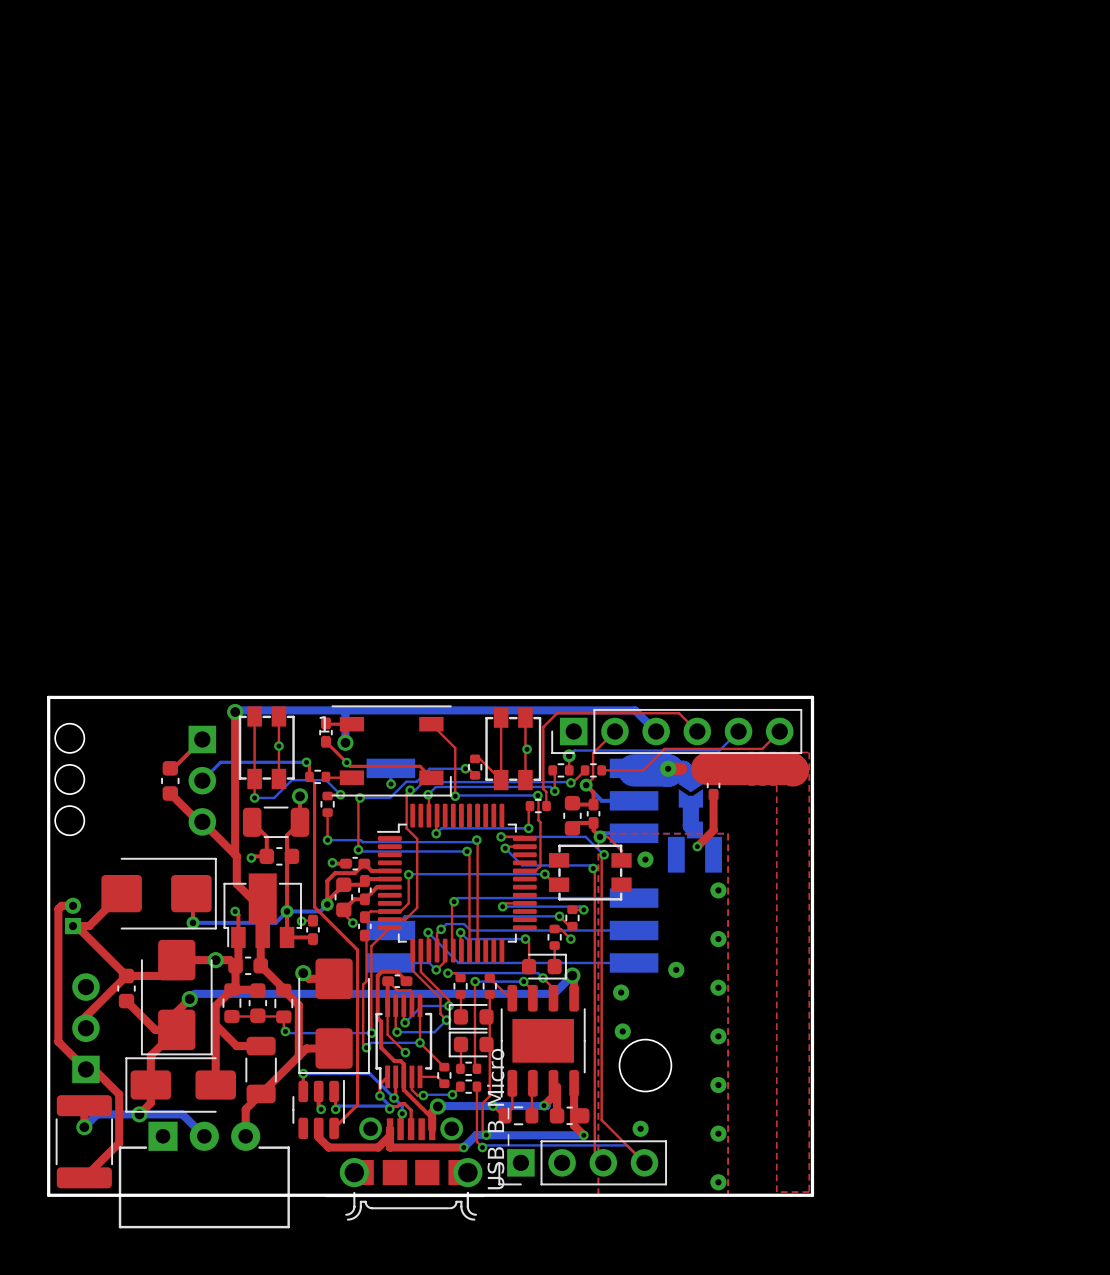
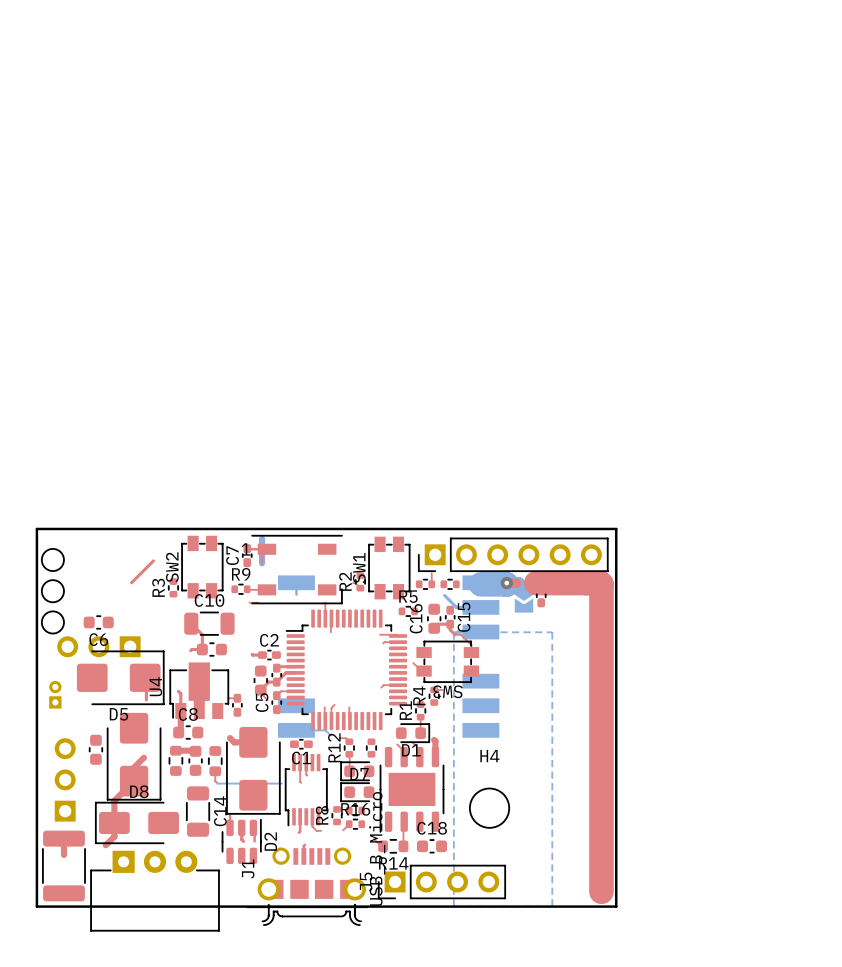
top track: (235, 712) (235, 854) -> none
bottom track: (235, 712) (236, 710) (635, 710) (656, 731) -> none
via: (235, 712) -> none
top track: (254, 716) (254, 797) -> none
top track: (278, 716) (278, 778) -> none
top track: (501, 717) (501, 780) (479, 758) (475, 758) -> none
top track: (525, 717) (525, 747) (527, 749) (525, 750) (525, 780) -> none
top track: (431, 724) (455, 748) (455, 796) -> none
top track: (614, 731) (593, 753) (593, 778) (586, 785) (593, 792) (593, 804) (573, 804) -> none
top track: (697, 731) (679, 713) (557, 713) (543, 727) (543, 788) (546, 791) (546, 805) -> none
bottom track: (738, 731) (719, 750) (574, 750) (569, 755) -> none
top track: (779, 731) (762, 748) (664, 748) (643, 770) (601, 770) -> none
C7 name: none -> C7 (232, 555)
top track: (325, 741) (350, 766) (420, 766) (431, 777) -> none
via: (345, 742) -> none
via: (278, 746) -> none
SW2 name: none -> SW2 (172, 567)
SW1 name: none -> SW1 (359, 568)
via: (527, 749) -> none
top zone outline: (747, 752) (809, 752) (809, 1192) (776, 1192) (776, 784) (747, 784) (747, 752) -> none
via: (569, 755) -> none
R9 name: none -> R9 (241, 574)
top track: (306, 762) (309, 765) (309, 776) (314, 782) (314, 907) (357, 950) (357, 1104) (334, 1128) -> none
bottom track: (306, 762) (220, 762) (202, 780) -> none
via: (306, 762) -> none
via: (346, 762) -> none
R2 name: none -> R2 (345, 581)
bottom track: (465, 768) (429, 768) (416, 781) (406, 781) (390, 797) (360, 797) -> none
via: (465, 768) -> none
top track: (585, 770) (570, 782) -> none
top track: none -> (601, 584) (601, 891)
top track: (554, 772) (554, 791) -> none
R3: none -> (173, 587)
part: (170, 780) -> none
part rotation: 0° (202, 780) -> 90° clockwise (98, 646)
part position: (202, 780) -> (98, 646)
bottom track: (570, 782) (423, 782) (415, 790) (410, 790) -> none
via: (570, 782) -> none
via: (391, 784) -> none
via: (586, 785) -> none
R5 name: none -> R5 (408, 596)
top track: (410, 790) (406, 793) (406, 828) (417, 838) (417, 907) (405, 919) (389, 919) -> none
via: (410, 790) -> none
C10 name: none -> C10 (209, 600)
bottom track: (554, 791) (550, 786) (435, 786) (428, 794) -> none
via: (554, 791) -> none
top track: (170, 793) (198, 821) -> none
bottom track: (340, 794) (325, 780) (291, 780) (274, 797) (254, 797) -> none
via: (340, 794) -> none
via: (428, 794) -> none
top track: (713, 794) (713, 830) (697, 846) -> none
top track: (537, 795) (538, 820) (540, 822) (540, 866) (535, 870) -> none
bottom track: (537, 795) (455, 796) -> none
via: (537, 795) -> none
top track: (300, 796) (300, 822) (287, 835) (287, 937) (311, 937) -> none
via: (300, 796) -> none
via: (455, 796) -> none
via: (254, 797) -> none
top track: (360, 797) (358, 799) (358, 849) -> none
via: (360, 797) -> none
bottom track: (690, 799) (690, 825) (694, 830) -> none
part: (327, 804) -> none
top track: (528, 807) (528, 828) -> none
top track: (327, 812) (327, 840) -> none
C15 name: none -> C15 (464, 617)
C16 name: none -> C16 (416, 618)
C6: none -> (98, 622)
top track: (202, 821) (236, 856) (236, 883) (262, 909) -> none
bottom track: (528, 828) (441, 828) (436, 833) -> none
via: (528, 828) -> none
via: (436, 833) -> none
top zone outline: (598, 833) (598, 1195) (728, 1195) (728, 833) (598, 833) -> none
bottom track: (501, 836) (585, 836) (604, 854) -> none
via: (501, 836) -> none
via: (600, 836) -> none
bottom track: (327, 840) (360, 840) (362, 842) (474, 842) (476, 840) -> none
via: (327, 840) -> none
top track: (476, 840) (477, 950) -> none
via: (476, 840) -> none
C2 name: none -> C2 (269, 640)
via: (697, 846) -> none
part: (694, 847) -> none
bottom track: (505, 848) (522, 865) (590, 865) (593, 868) -> none
via: (505, 848) -> none
bottom track: (358, 849) (360, 851) (467, 851) -> none
via: (358, 849) -> none
top track: (467, 851) (469, 853) (469, 950) -> none
via: (467, 851) -> none
top track: (604, 854) (601, 856) (601, 1120) (644, 1162) -> none
via: (604, 854) -> none
via: (251, 857) -> none
via: (645, 859) -> none
via: (332, 862) -> none
top track: (593, 868) (594, 870) (594, 1154) -> none
via: (593, 868) -> none
top track: (389, 870) (371, 870) (364, 863) (354, 873) (335, 873) (327, 880) (327, 904) -> none
top track: (408, 874) (408, 903) (400, 911) -> none
via: (408, 874) -> none
bottom track: (544, 874) (408, 874) -> none
via: (544, 874) -> none
top track: (364, 880) (361, 884) (343, 884) (327, 901) -> none
via: (718, 890) -> none
top track: (121, 893) (89, 926) (72, 926) -> none
bottom track: (634, 898) (457, 898) (454, 901) -> none
top track: (454, 901) (452, 903) (452, 949) -> none
via: (454, 901) -> none
bottom track: (327, 904) (320, 911) (287, 911) (275, 922) (193, 922) -> none
via: (327, 904) -> none
top track: (72, 905) (61, 905) (58, 908) (58, 1041) (85, 1069) -> none
U4 name: none -> U4 (155, 686)
bottom track: (502, 906) (580, 906) (583, 909) -> none
via: (502, 906) -> none
via: (583, 909) -> none
via: (235, 911) -> none
via: (287, 911) -> none
SW3 name: none -> SW3 (448, 691)
top track: (559, 916) (569, 926) -> none
bottom track: (559, 916) (405, 916) (390, 930) -> none
via: (559, 916) -> none
R4 name: none -> R4 (419, 695)
via: (301, 921) -> none
via: (193, 922) -> none
via: (352, 923) -> none
top track: (76, 926) (126, 975) -> none
C5 name: none -> C5 (262, 702)
top track: (389, 927) (371, 946) (371, 1033) -> none
bottom track: (441, 929) (446, 924) (464, 924) (470, 930) (634, 930) -> none
via: (441, 929) -> none
top track: (554, 929) (560, 929) (570, 939) -> none
bottom track: (428, 932) (458, 962) (634, 962) -> none
via: (428, 932) -> none
bottom track: (460, 932) (467, 939) (525, 939) -> none
via: (460, 932) -> none
top track: (366, 937) (366, 981) (363, 984) (363, 1044) (366, 1047) -> none
R1 name: none -> R1 (405, 710)
top track: (260, 938) (260, 965) (283, 988) -> none
top track: (525, 939) (529, 942) (529, 966) -> none
via: (525, 939) -> none
via: (570, 939) -> none
via: (718, 939) -> none
D5 name: none -> D5 (118, 714)
C8 name: none -> C8 (188, 714)
top track: (412, 950) (412, 970) (440, 998) (440, 1013) (446, 1020) -> none
top track: (420, 950) (420, 971) (448, 1000) (448, 1005) -> none
via: (215, 960) -> none
top track: (445, 961) (436, 969) -> none
via: (436, 969) -> none
via: (676, 969) -> none
via: (303, 973) -> none
via: (447, 973) -> none
bottom track: (448, 973) (538, 973) (543, 978) -> none
top track: (126, 975) (85, 1016) (85, 1028) -> none
top track: (126, 975) (160, 975) (176, 960) (229, 960) (235, 965) (235, 986) (215, 1005) (215, 1085) -> none
bottom track: (572, 975) (554, 993) (194, 993) (189, 999) -> none
via: (572, 975) -> none
top track: (489, 977) (510, 998) -> none
via: (543, 978) -> none
top track: (387, 981) (387, 1034) (405, 1052) -> none
top track: (388, 981) (397, 990) (411, 991) (411, 1005) -> none
top track: (406, 981) (397, 971) (381, 971) (377, 975) (377, 1018) (381, 1021) (381, 1047) (394, 1061) (400, 1061) (403, 1064) (403, 1089) (432, 1118) (432, 1129) (432, 1112) (437, 1106) -> none
top track: (474, 981) (474, 1066) -> none
bottom track: (475, 981) (523, 981) -> none
via: (475, 981) -> none
via: (523, 981) -> none
R12 name: none -> R12 (334, 747)
via: (718, 987) -> none
D1 name: none -> D1 (411, 750)
top track: (283, 990) (298, 1005) (298, 1056) -> none
via: (621, 992) -> none
top track: (489, 994) (489, 1096) (482, 1103) (482, 1131) (486, 1135) -> none
H4 name: none -> H4 (489, 756)
via: (189, 999) -> none
C1 name: none -> C1 (301, 758)
top track: (126, 1001) (155, 1029) (176, 1029) -> none
top track: (420, 1005) (420, 1042) (444, 1067) -> none
bottom track: (448, 1005) (421, 1005) (405, 1022) -> none
via: (448, 1005) -> none
top track: (231, 1016) (283, 1016) -> none
bottom track: (446, 1020) (434, 1032) (397, 1032) -> none
via: (446, 1020) -> none
D7 name: none -> D7 (359, 774)
via: (405, 1022) -> none
top track: (215, 1025) (236, 1046) (261, 1046) -> none
via: (285, 1031) -> none
via: (622, 1031) -> none
via: (397, 1032) -> none
via: (371, 1033) -> none
via: (718, 1036) -> none
bottom track: (420, 1042) (371, 1042) (366, 1047) -> none
via: (420, 1042) -> none
D8 name: none -> D8 (139, 791)
top track: (460, 1044) (460, 1068) -> none
via: (366, 1047) -> none
top track: (334, 1048) (306, 1048) (245, 1109) (245, 1136) -> none
via: (405, 1052) -> none
R16 name: none -> R16 (355, 809)
top track: (94, 1069) (119, 1094) (119, 1142) (84, 1177) -> none
C14 name: none -> C14 (220, 811)
bottom track: (303, 1073) (369, 1073) (402, 1106) (402, 1113) -> none
via: (303, 1073) -> none
R8 name: none -> R8 (322, 815)
top track: (387, 1076) (379, 1084) (379, 1095) -> none
top track: (420, 1076) (437, 1076) (444, 1083) -> none
top track: (512, 1083) (512, 1108) (505, 1115) -> none
top track: (574, 1083) (574, 1125) (583, 1135) -> none
via: (718, 1085) -> none
top track: (476, 1086) (476, 1141) (482, 1147) -> none
C18 name: none -> C18 (432, 828)
bottom track: (452, 1094) (423, 1095) -> none
via: (452, 1094) -> none
bottom track: (379, 1095) (389, 1105) (389, 1108) (386, 1106) (338, 1106) (335, 1109) -> none
via: (379, 1095) -> none
via: (423, 1095) -> none
via: (394, 1097) -> none
top track: (544, 1105) (553, 1096) (553, 1083) (557, 1086) (557, 1115) -> none
via: (544, 1105) -> none
via: (437, 1106) -> none
via: (493, 1106) -> none
bottom track: (546, 1106) (437, 1106) -> none
top track: (389, 1108) (404, 1103) (411, 1110) (411, 1129) -> none
via: (389, 1108) -> none
via: (321, 1109) -> none
via: (335, 1109) -> none
D2 name: none -> D2 (270, 841)
via: (402, 1113) -> none
via: (139, 1114) -> none
bottom track: (84, 1127) (97, 1114) (182, 1114) (204, 1136) -> none
via: (84, 1127) -> none
top track: (318, 1128) (318, 1137) (328, 1147) (378, 1147) (390, 1135) -> none
via: (640, 1128) -> none
top track: (390, 1129) (390, 1147) (463, 1147) -> none
via: (718, 1133) -> none
bottom track: (486, 1135) (476, 1135) (463, 1147) -> none
bottom track: (486, 1135) (583, 1135) -> none
via: (486, 1135) -> none
via: (583, 1135) -> none
R14 name: none -> R14 (393, 863)
J1 name: none -> J1 (248, 868)
via: (463, 1147) -> none
bottom track: (482, 1147) (484, 1145) (627, 1145) (644, 1162) -> none
via: (482, 1147) -> none
J5 name: none -> J5 (366, 881)
via: (718, 1182) -> none

